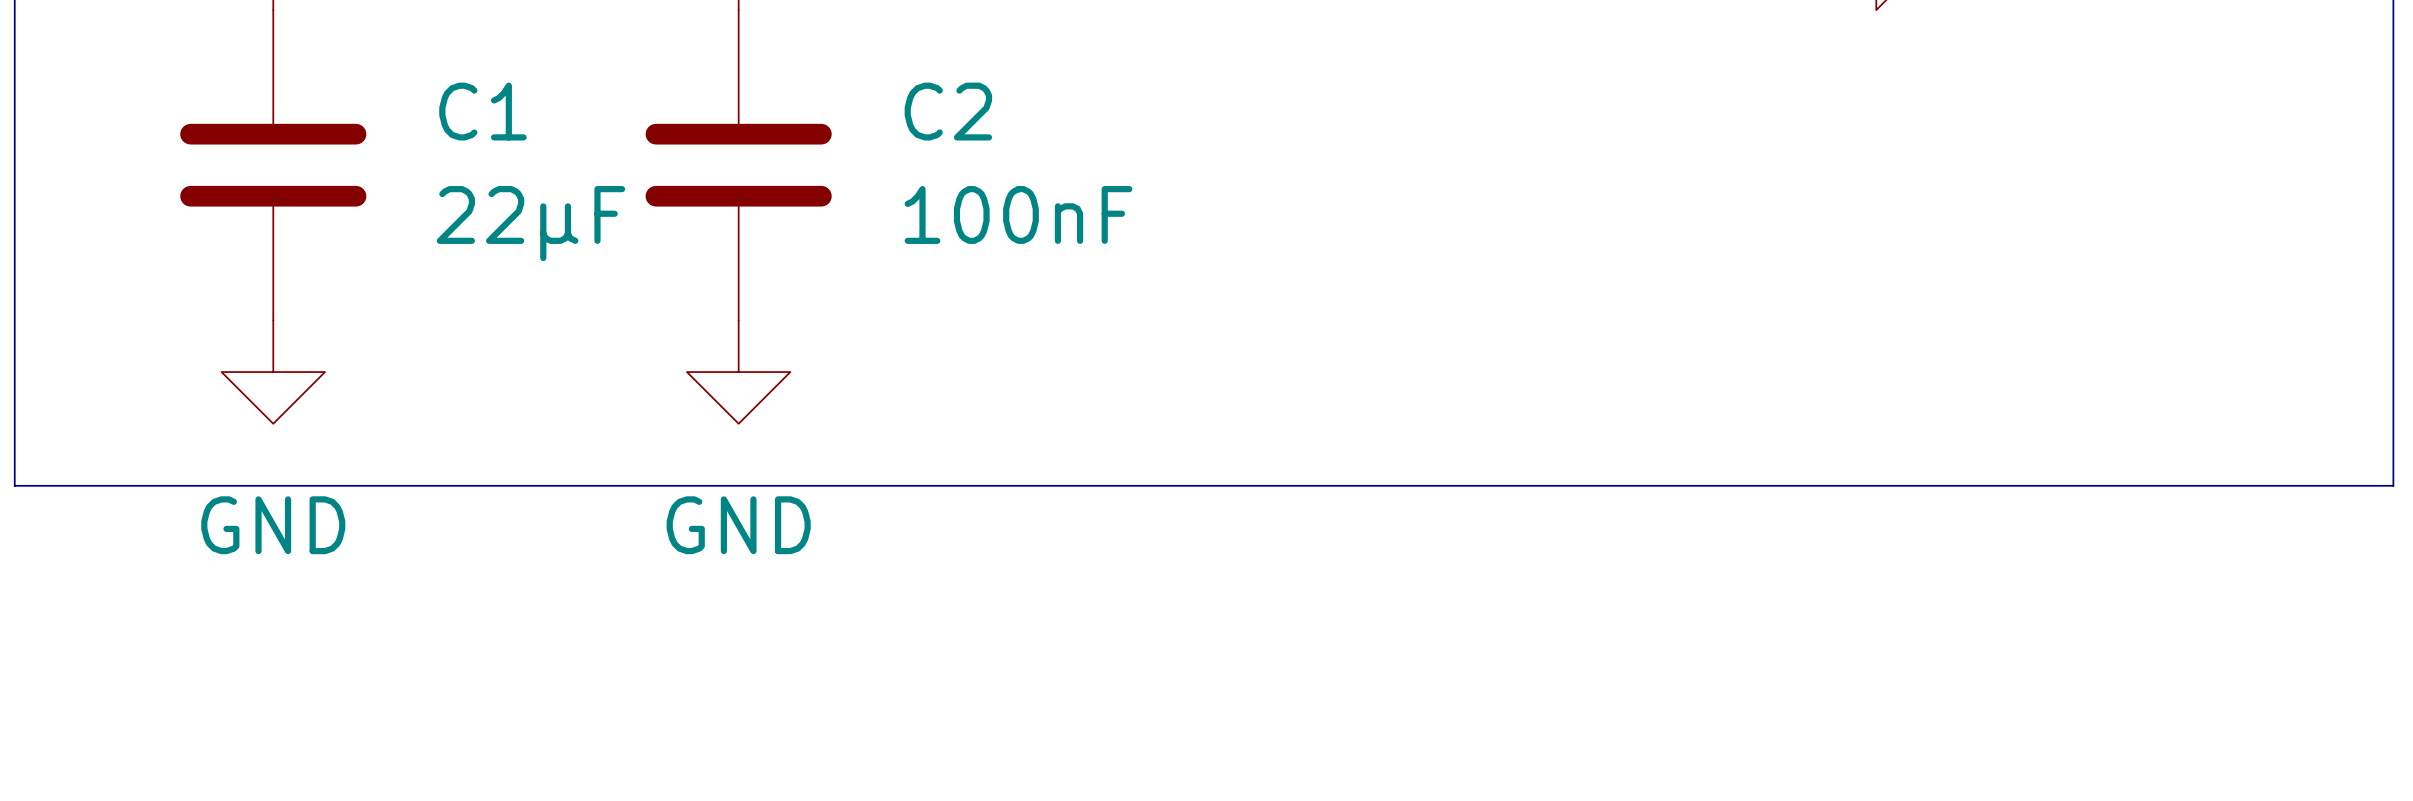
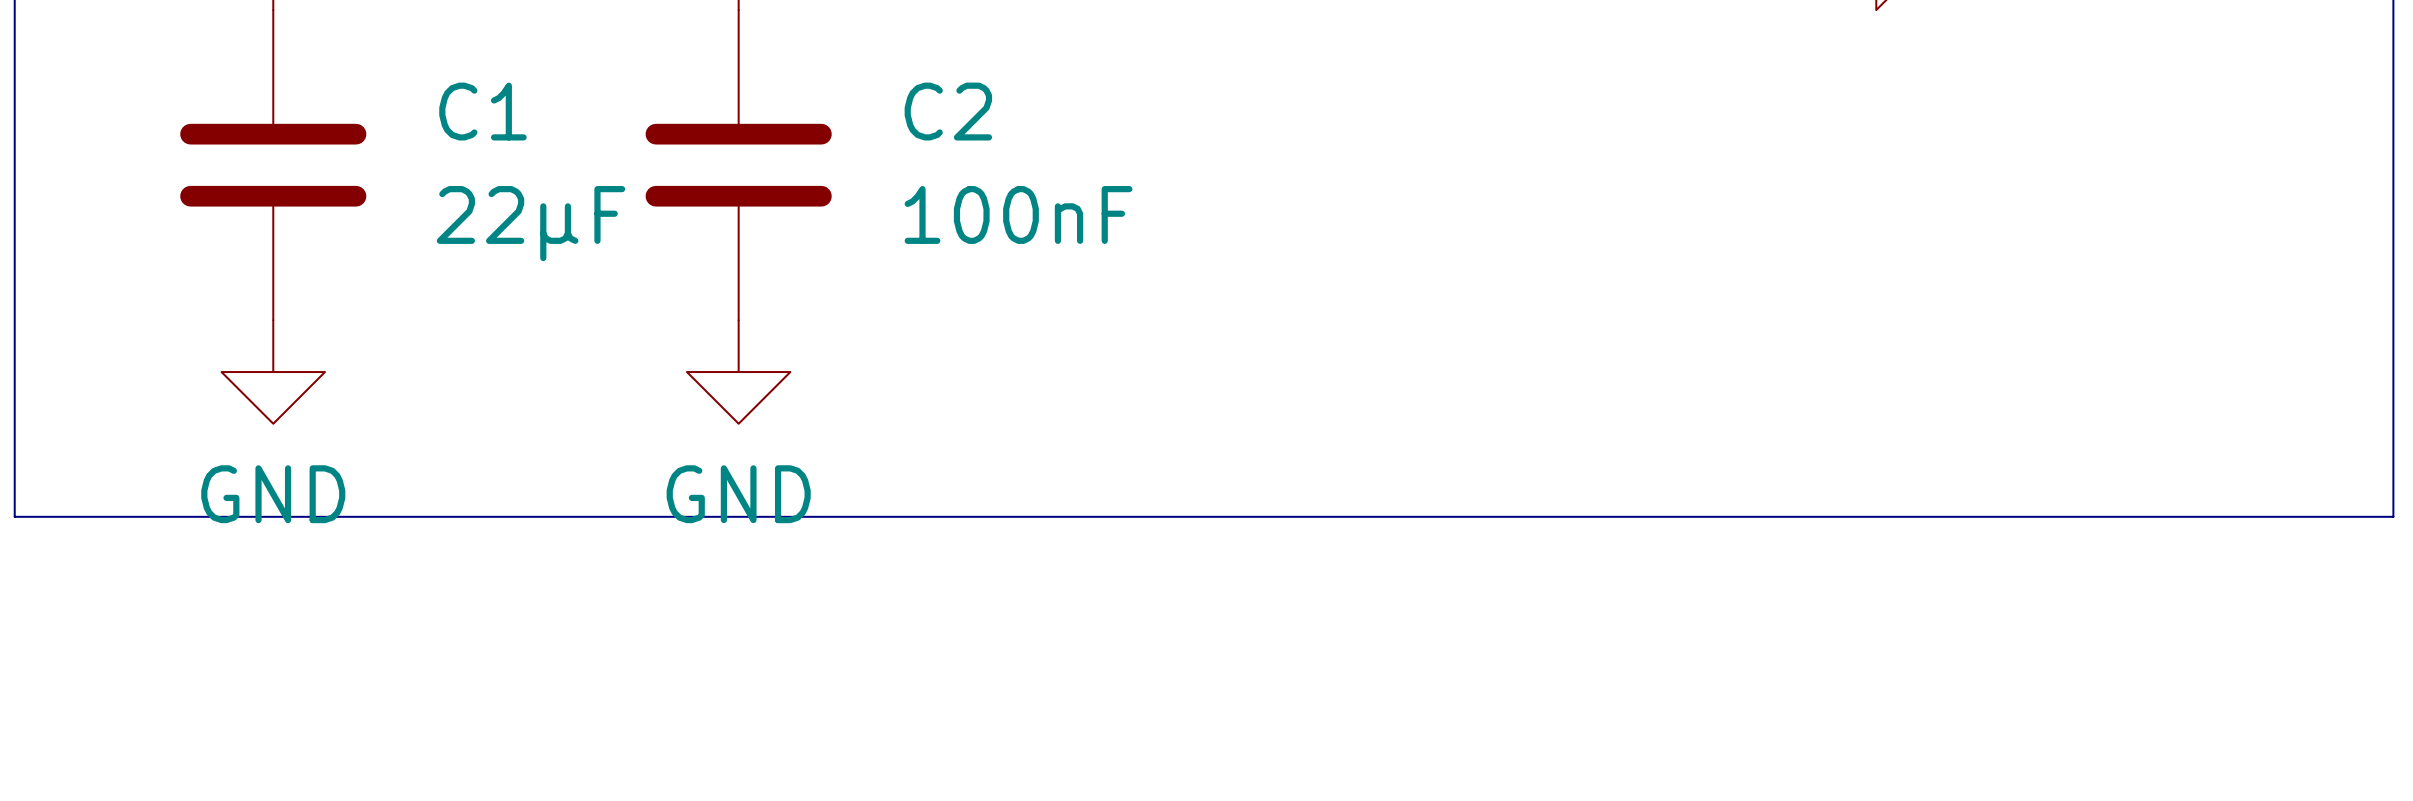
line: (14, 485) (2393, 485) -> (14, 485) (14, 516) (2393, 516) (2393, 485)
power symbol text position: GND (273, 525) -> GND (273, 494)
power symbol text position: GND (738, 525) -> GND (738, 494)

